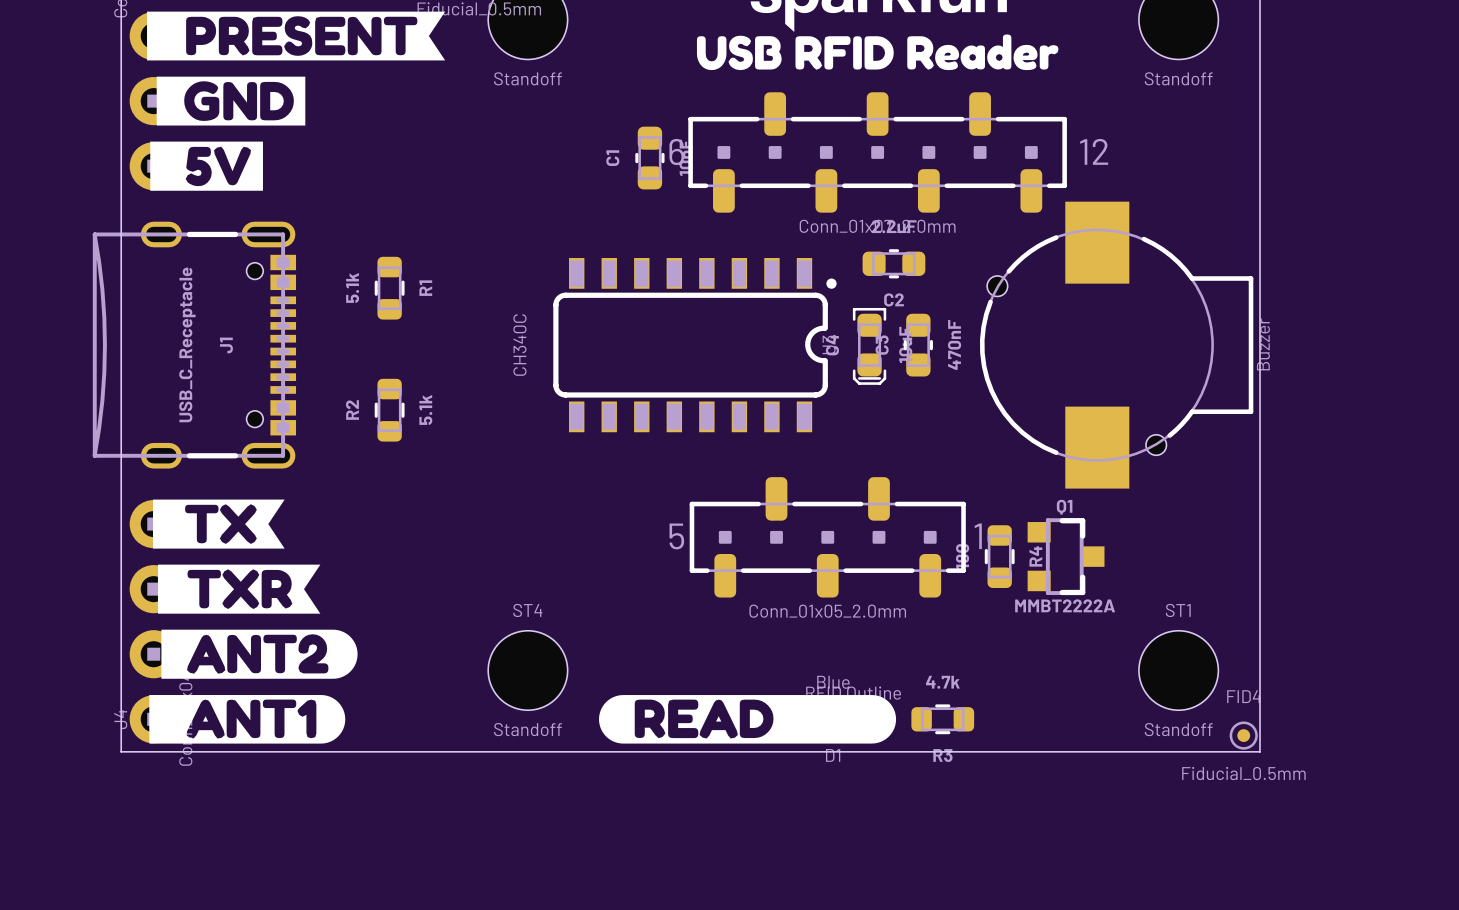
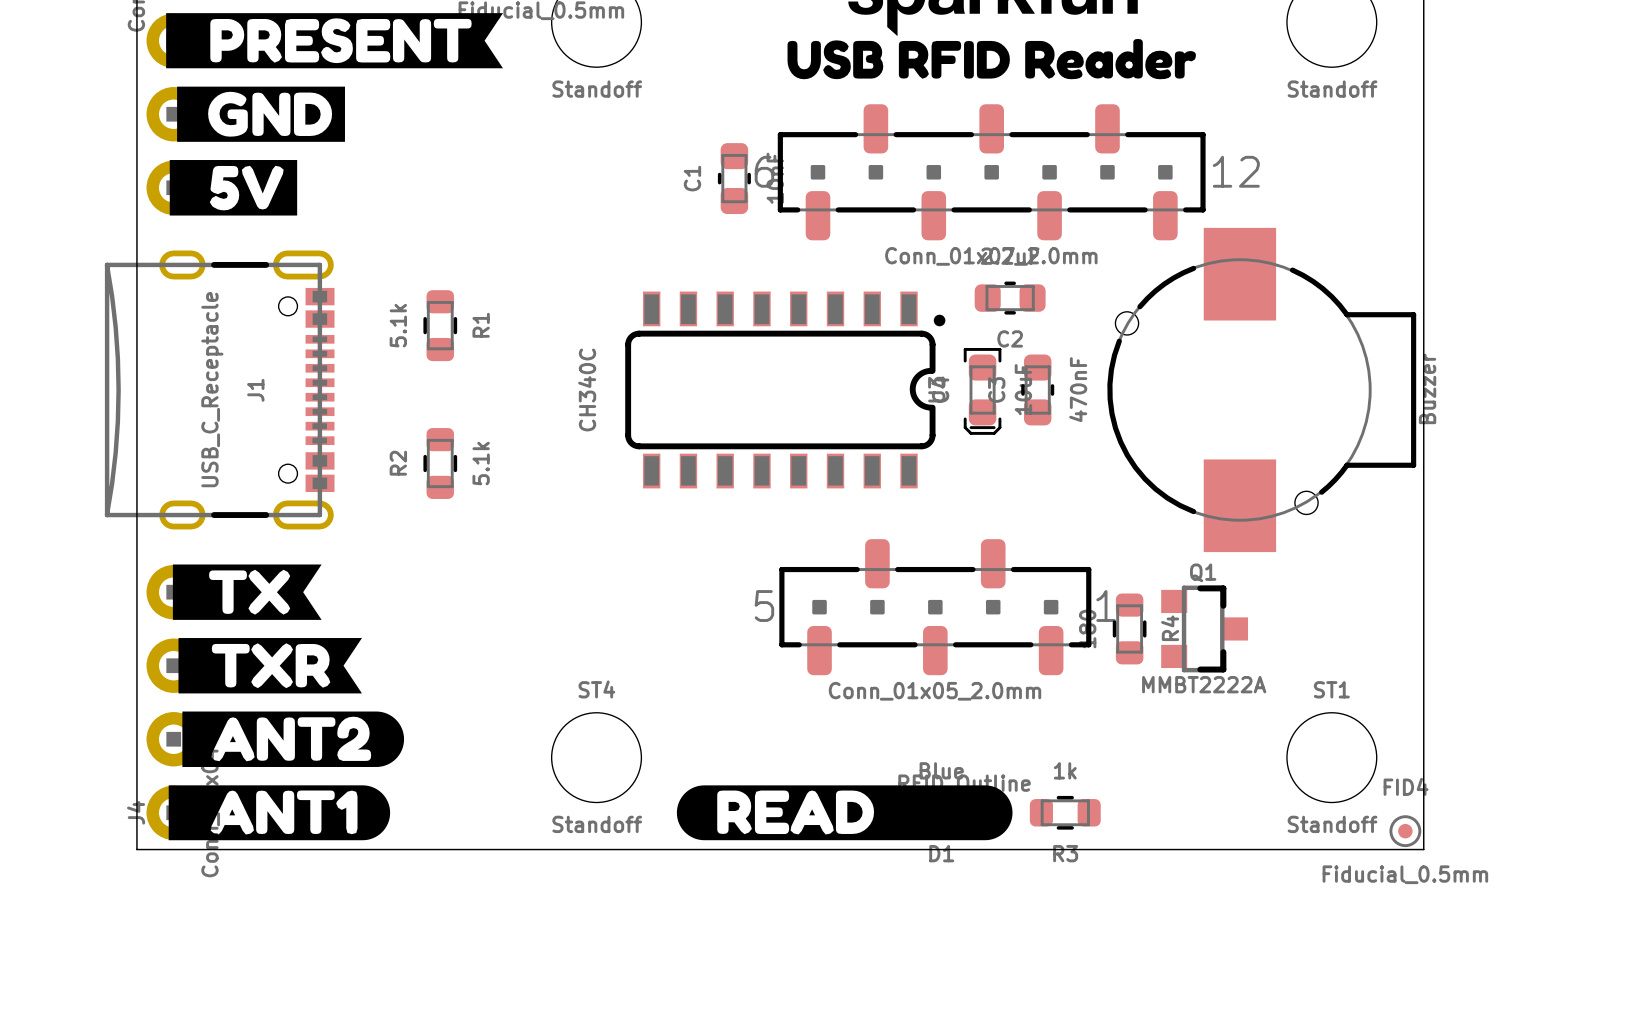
R3 value: 4.7k (942, 682) -> 1k (1065, 770)

